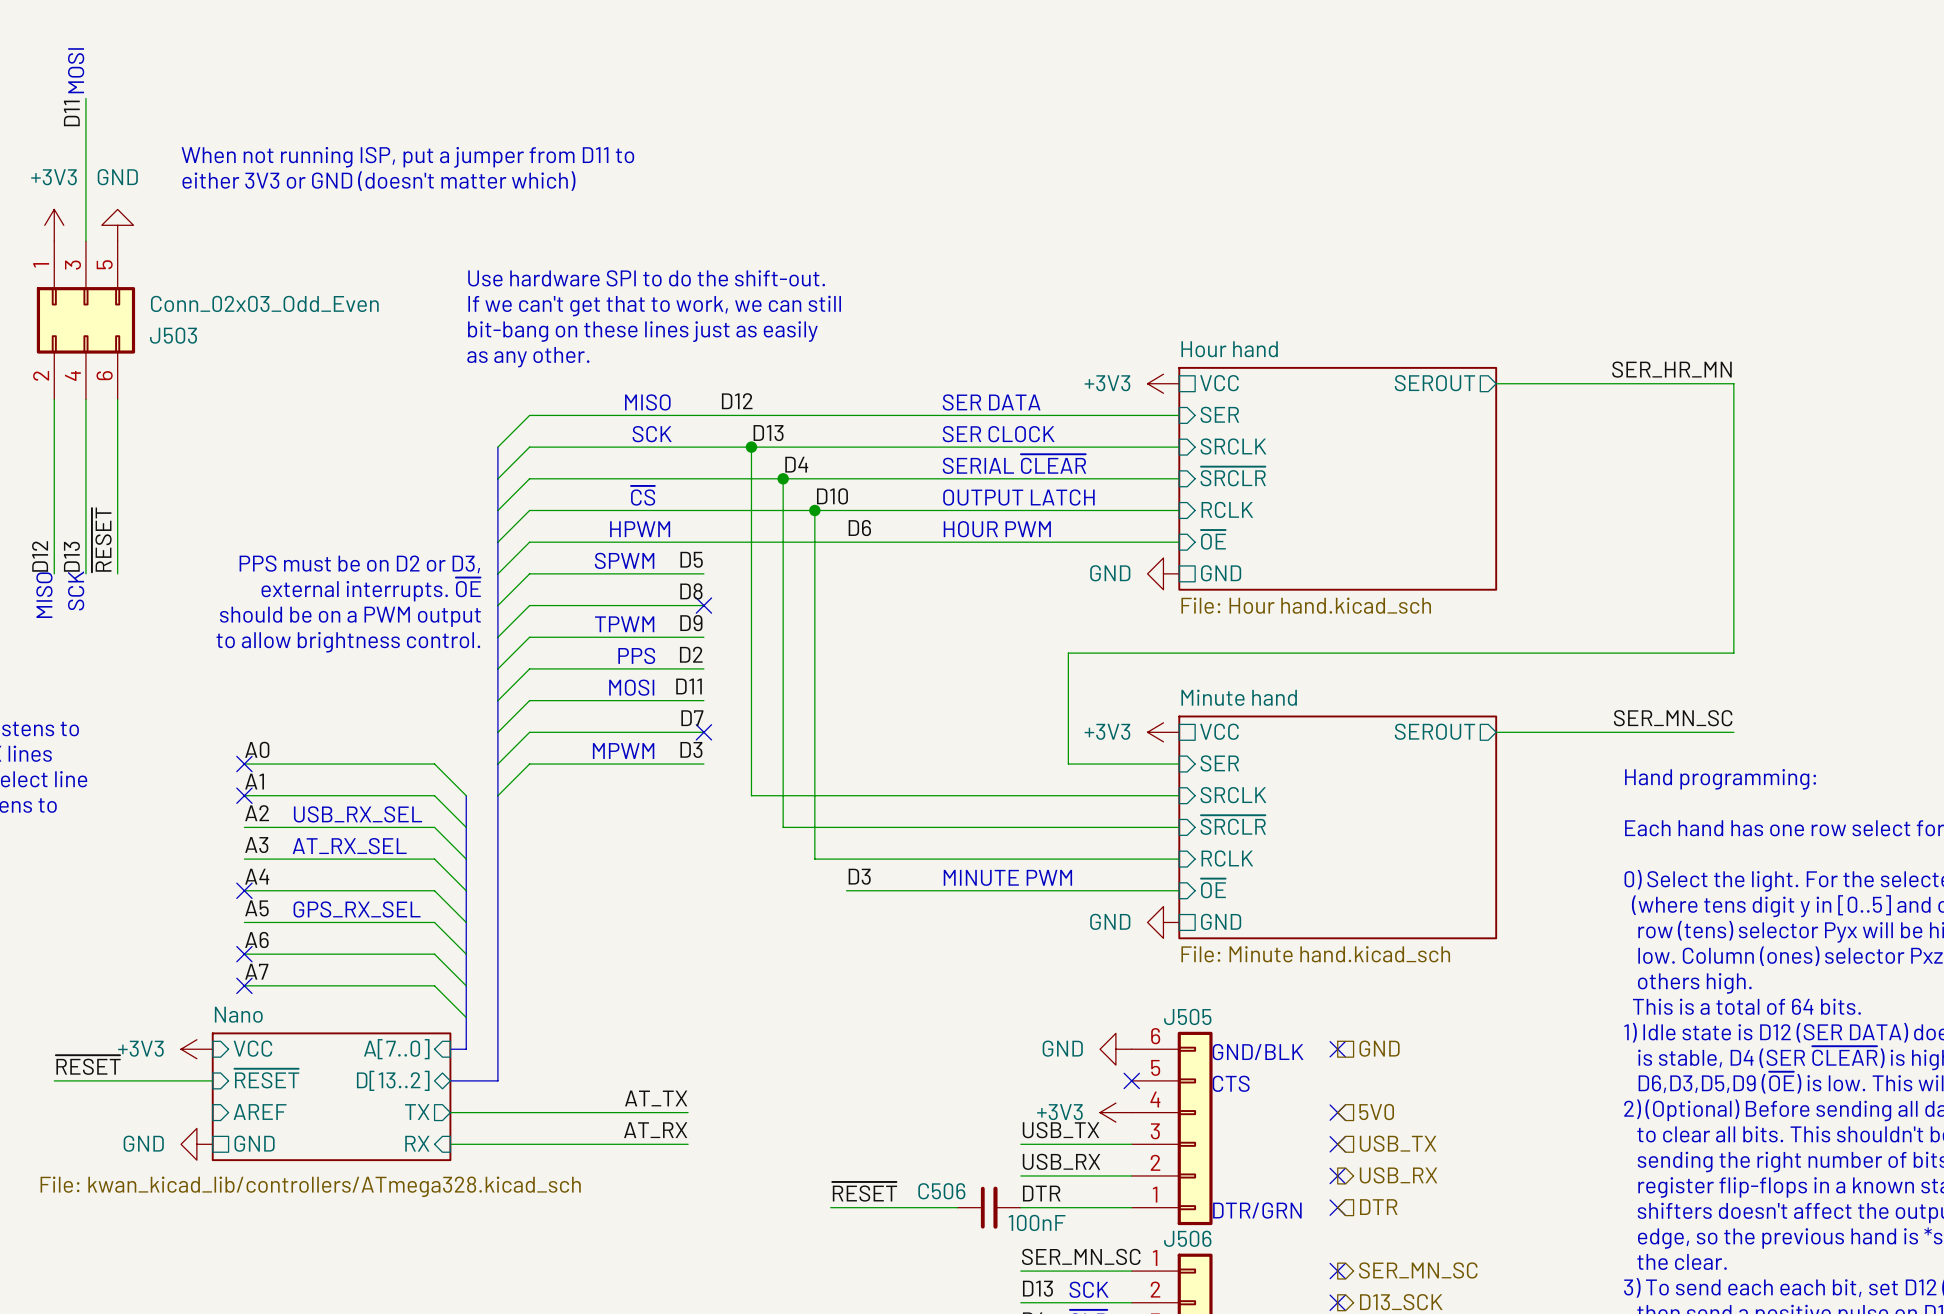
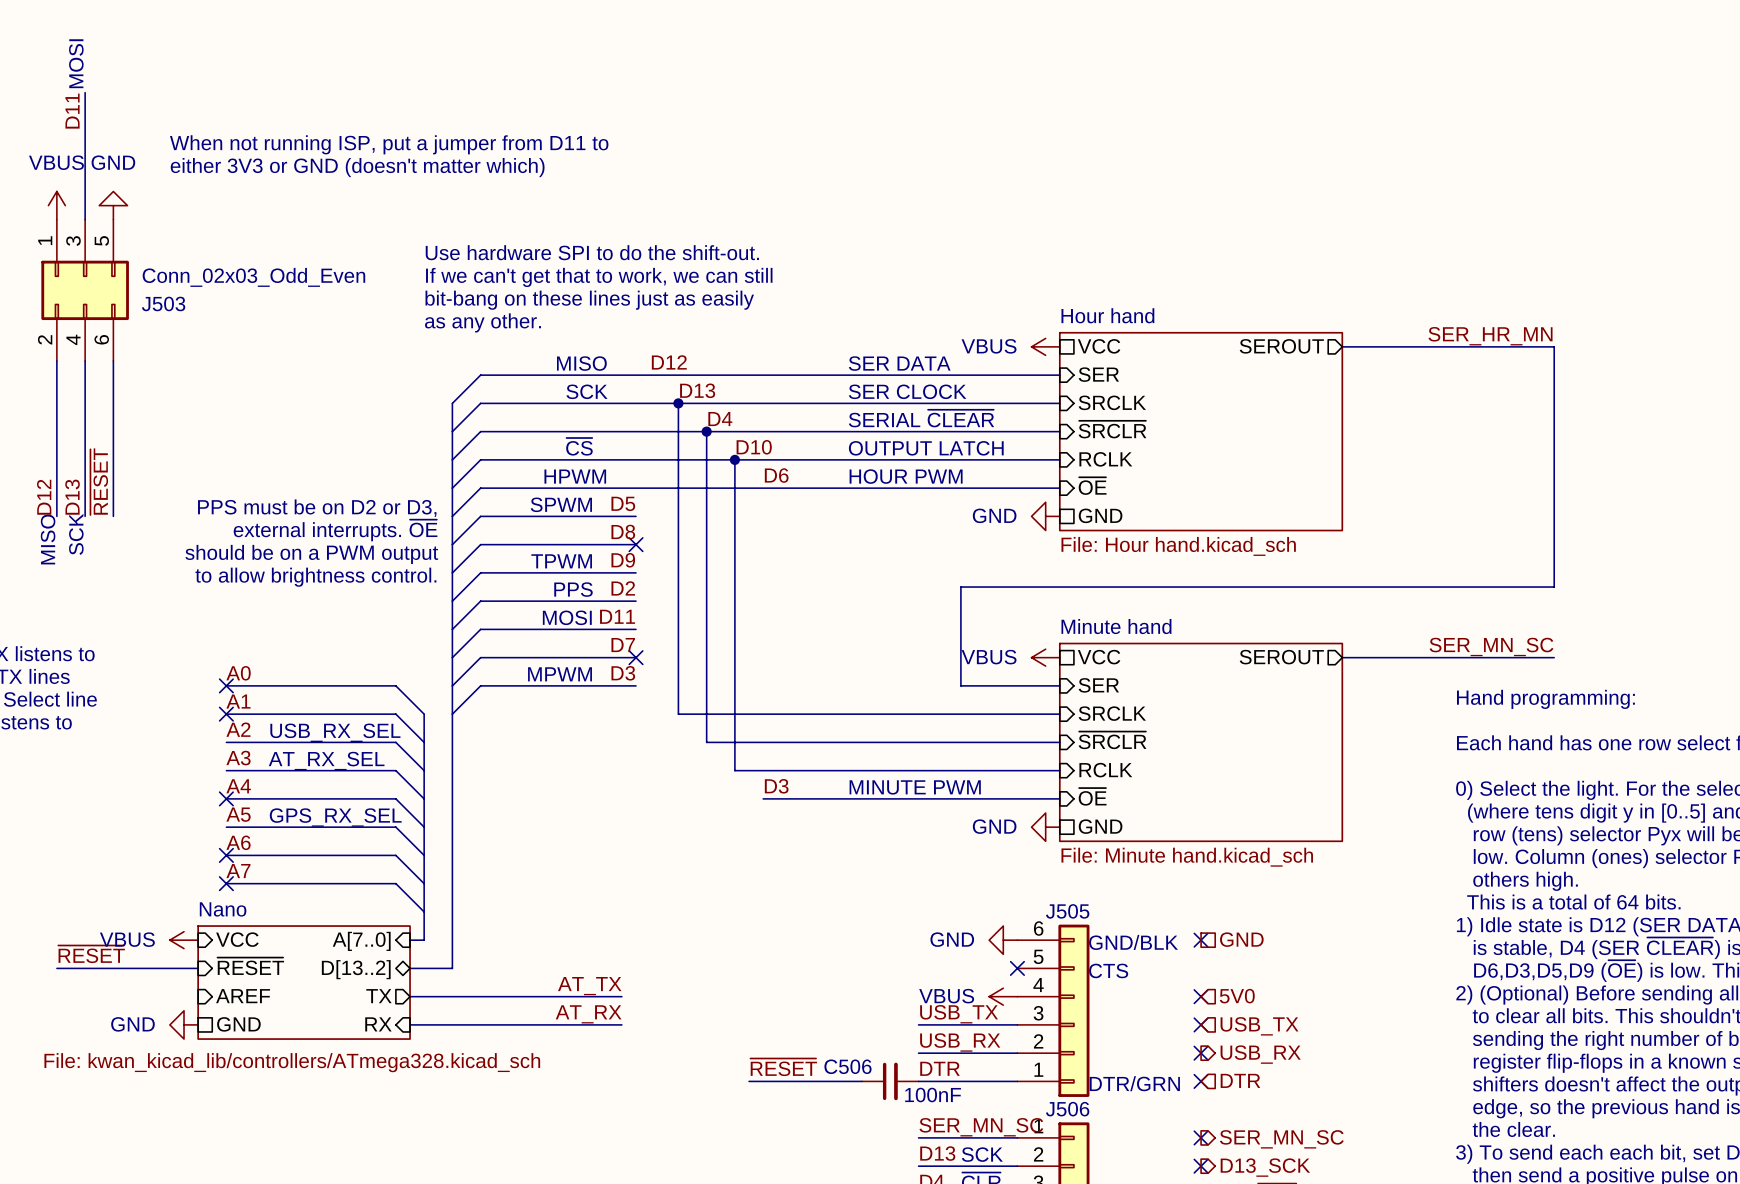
power symbol: +3V3 (54, 225) -> VBUS (56, 205)
power symbol: +3V3 (1163, 383) -> VBUS (1045, 346)
power symbol: +3V3 (1163, 732) -> VBUS (1045, 657)
power symbol: +3V3 (196, 1049) -> VBUS (184, 940)
power symbol: +3V3 (1115, 1112) -> VBUS (1003, 996)

